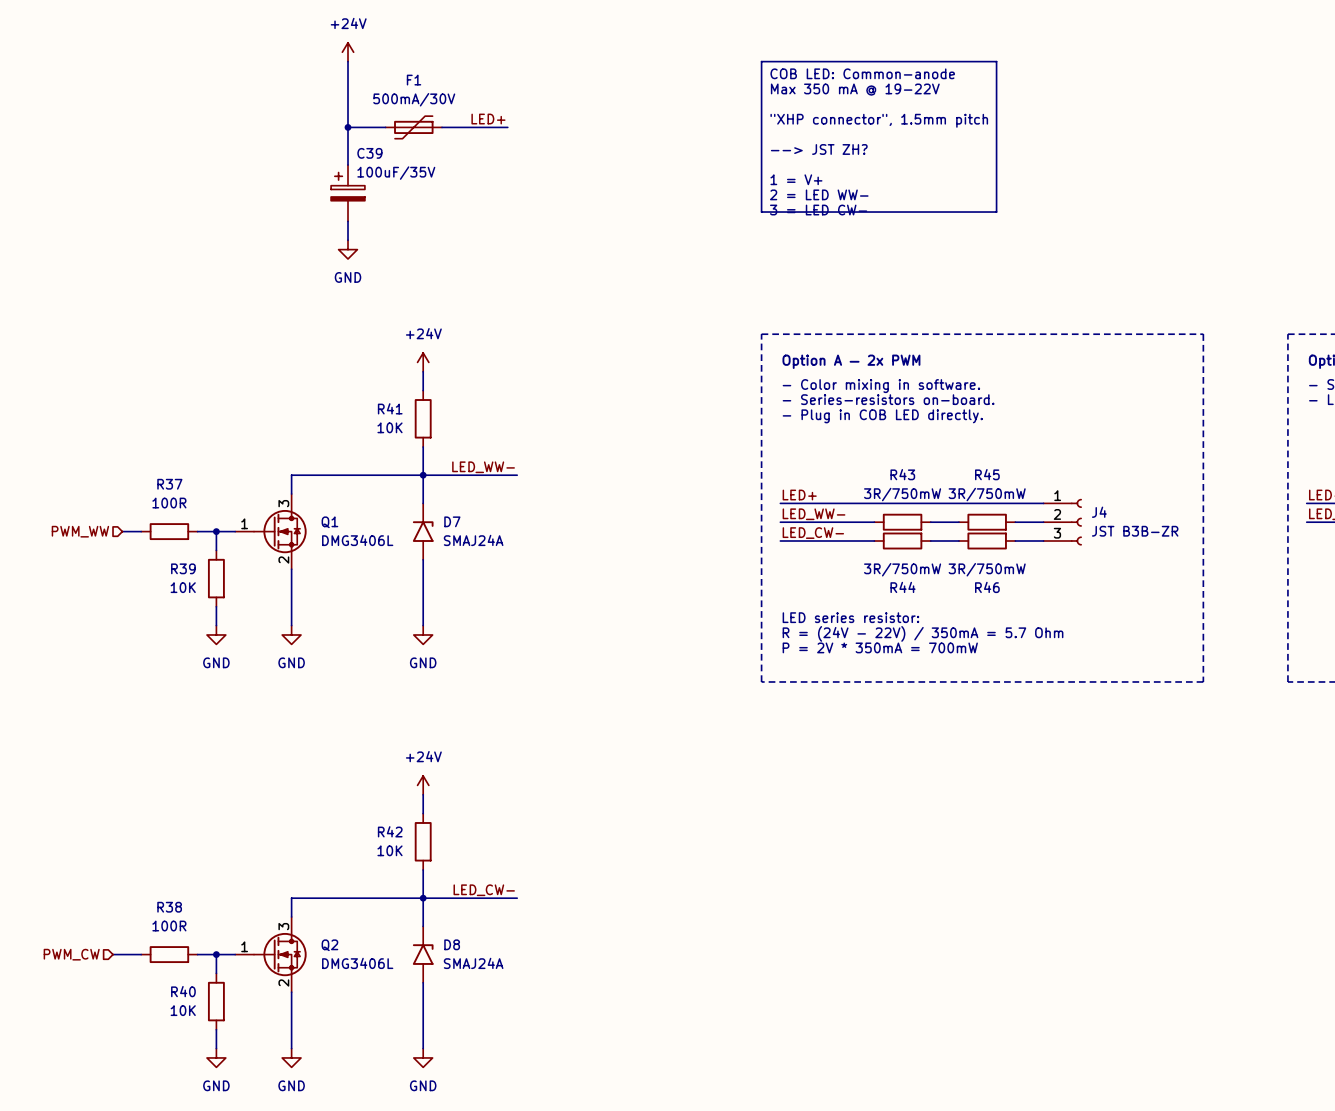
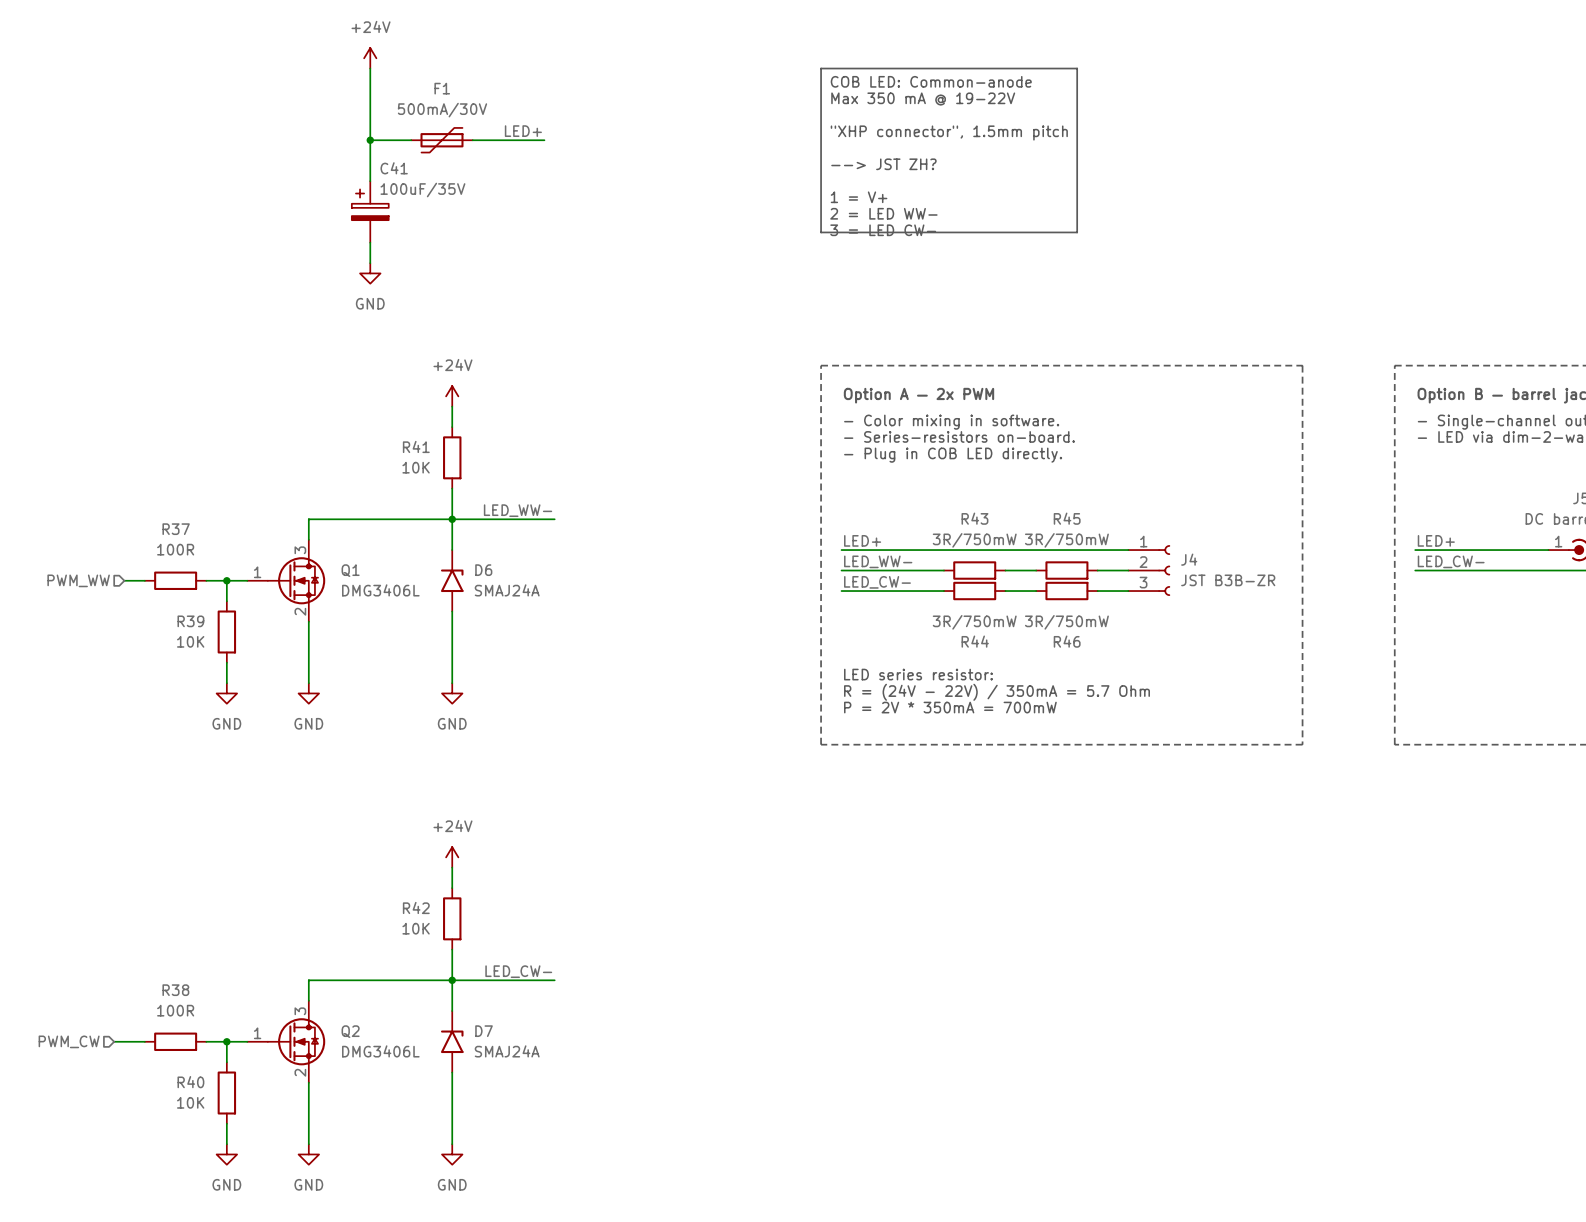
C39 name: C39 (369, 153) -> C41 (394, 168)
D7 name: D7 (452, 521) -> D6 (483, 570)
D8 name: D8 (452, 944) -> D7 (484, 1031)

